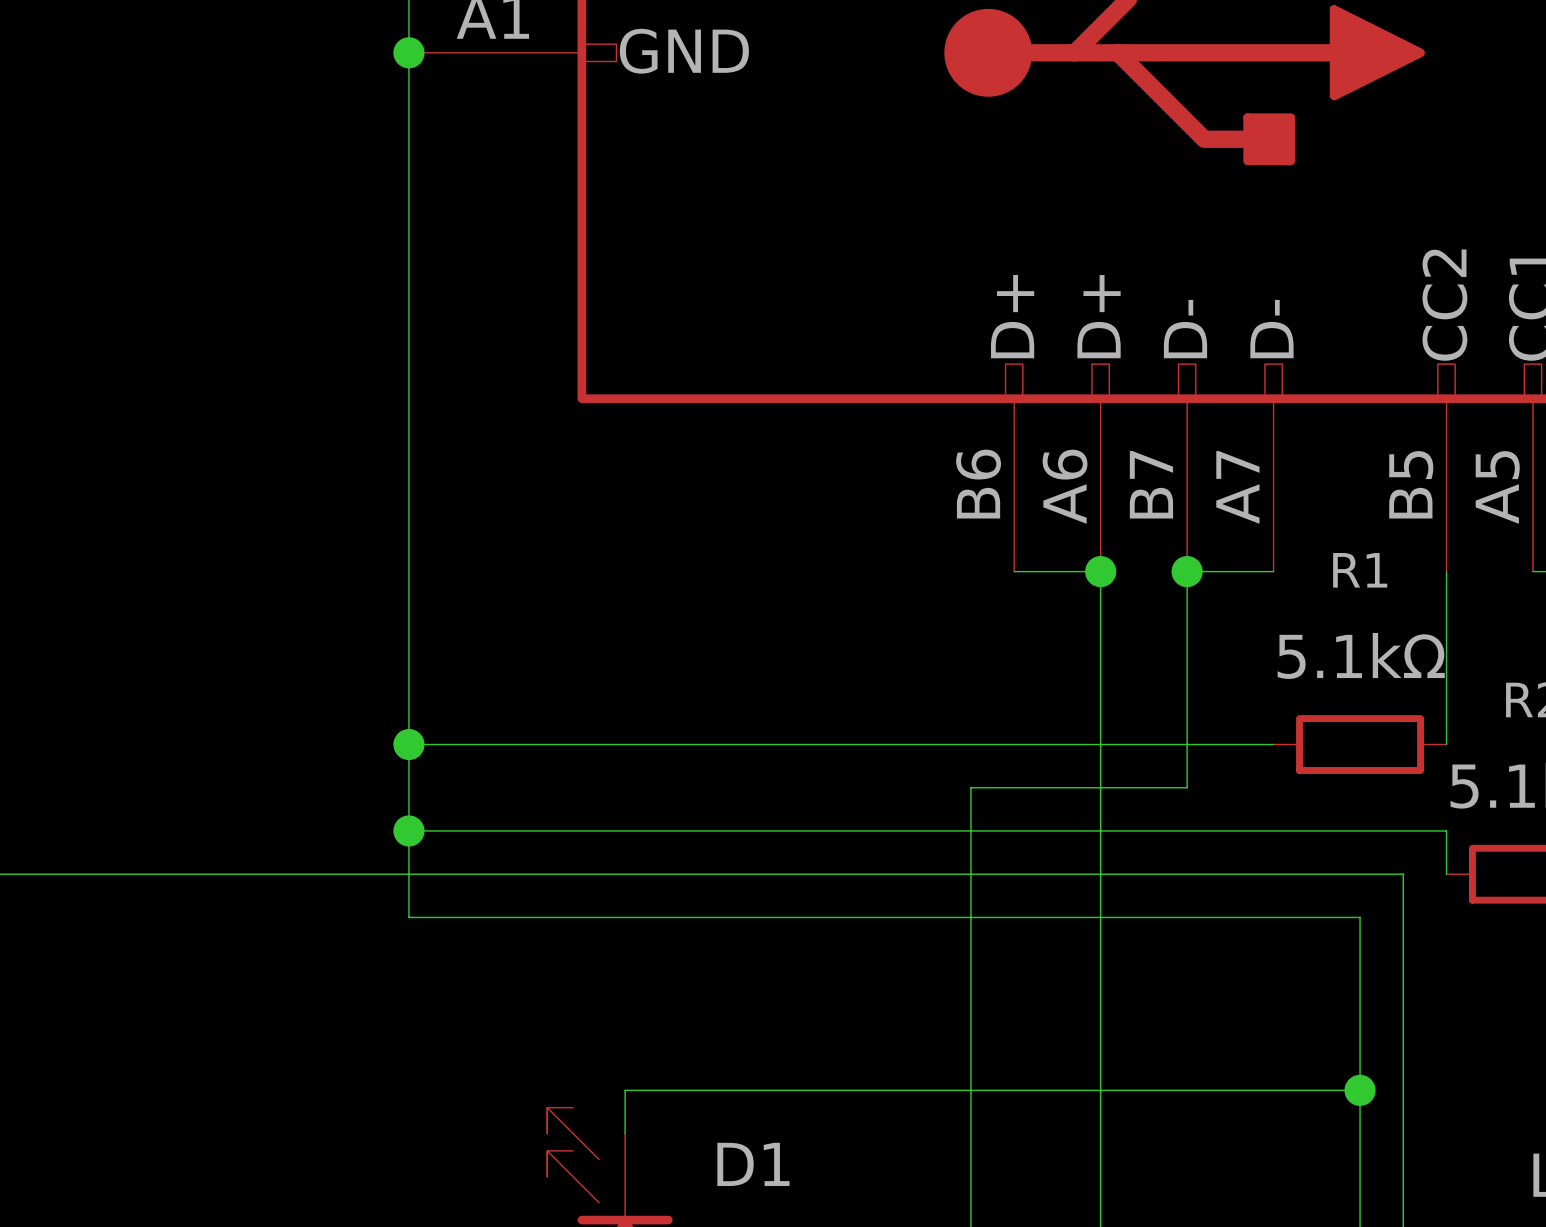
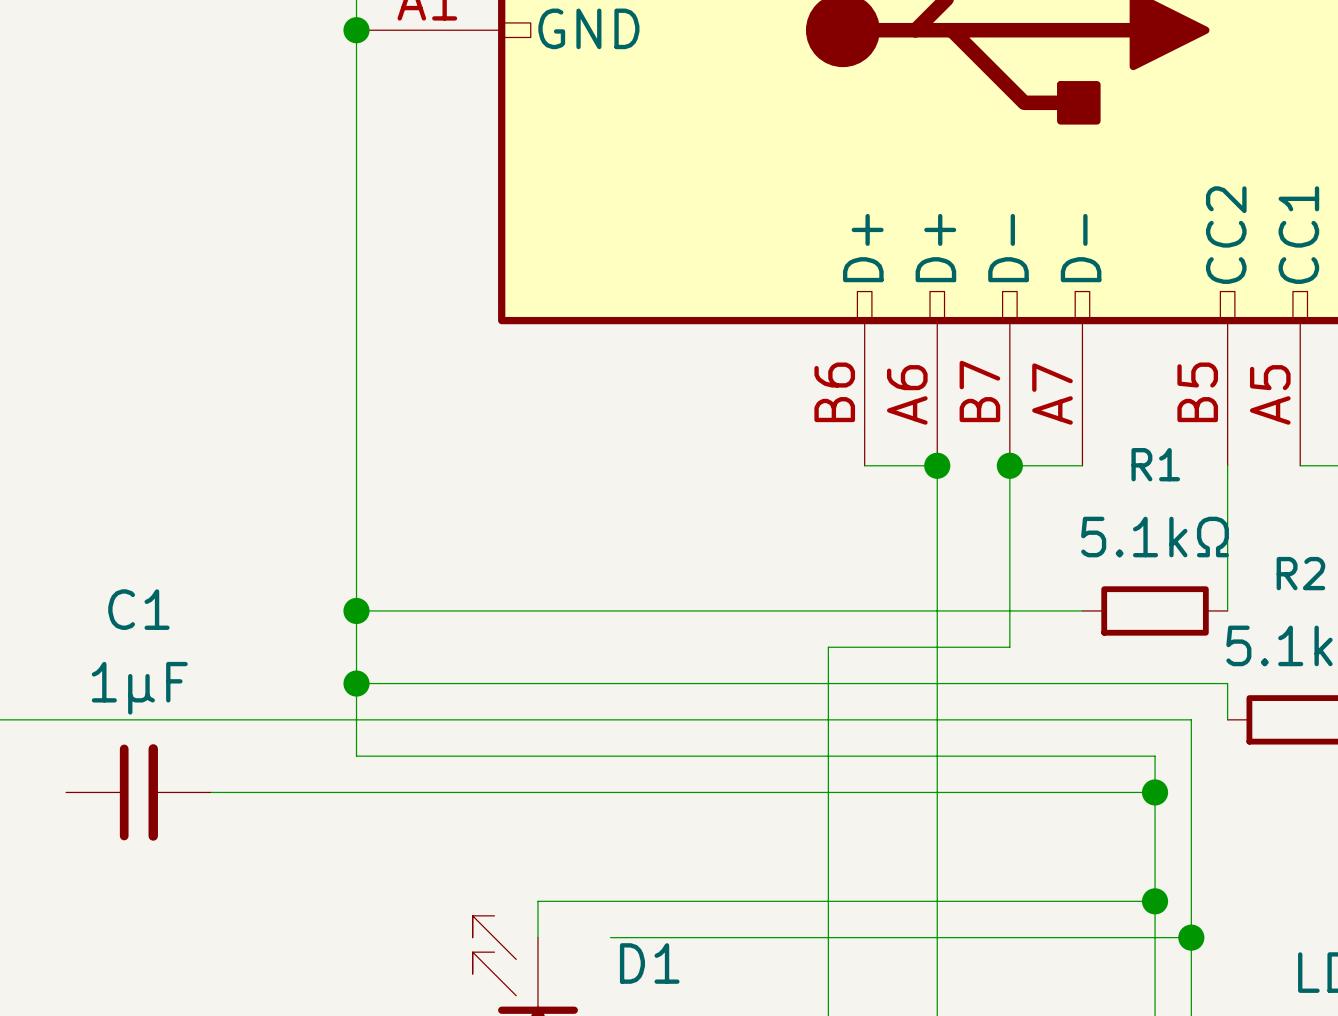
C1: none -> 1µF (138, 792)
wire: none -> (211, 792) (1155, 792)
junction: none -> (1155, 792)
wire: none -> (610, 937) (1191, 937)
junction: none -> (1191, 937)

